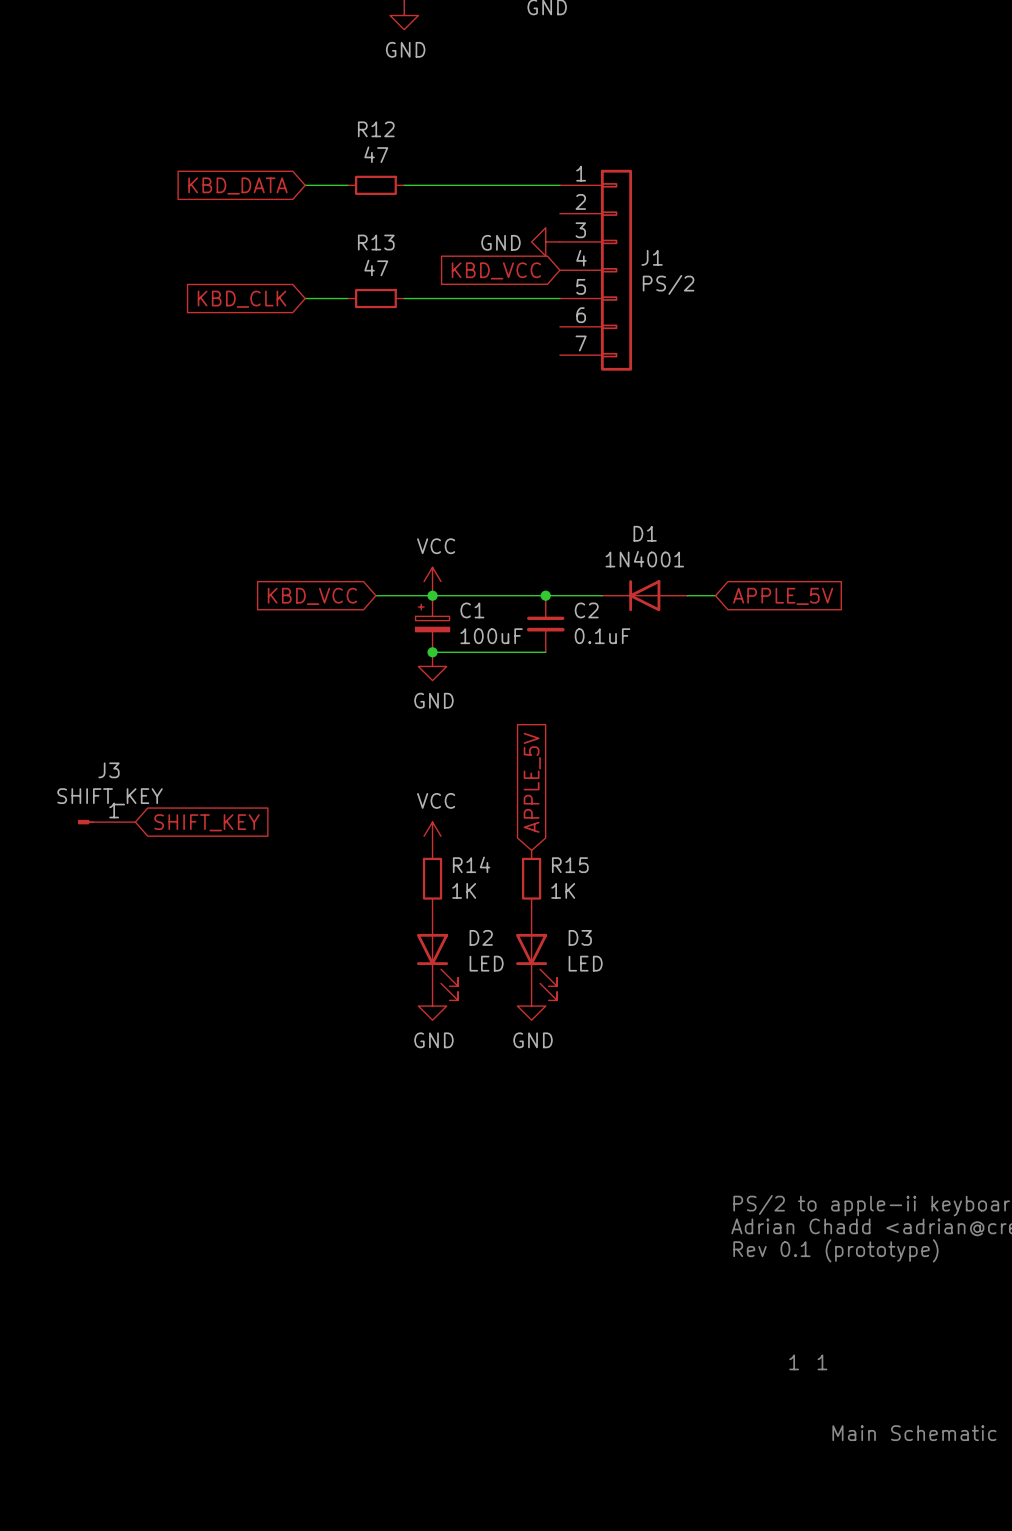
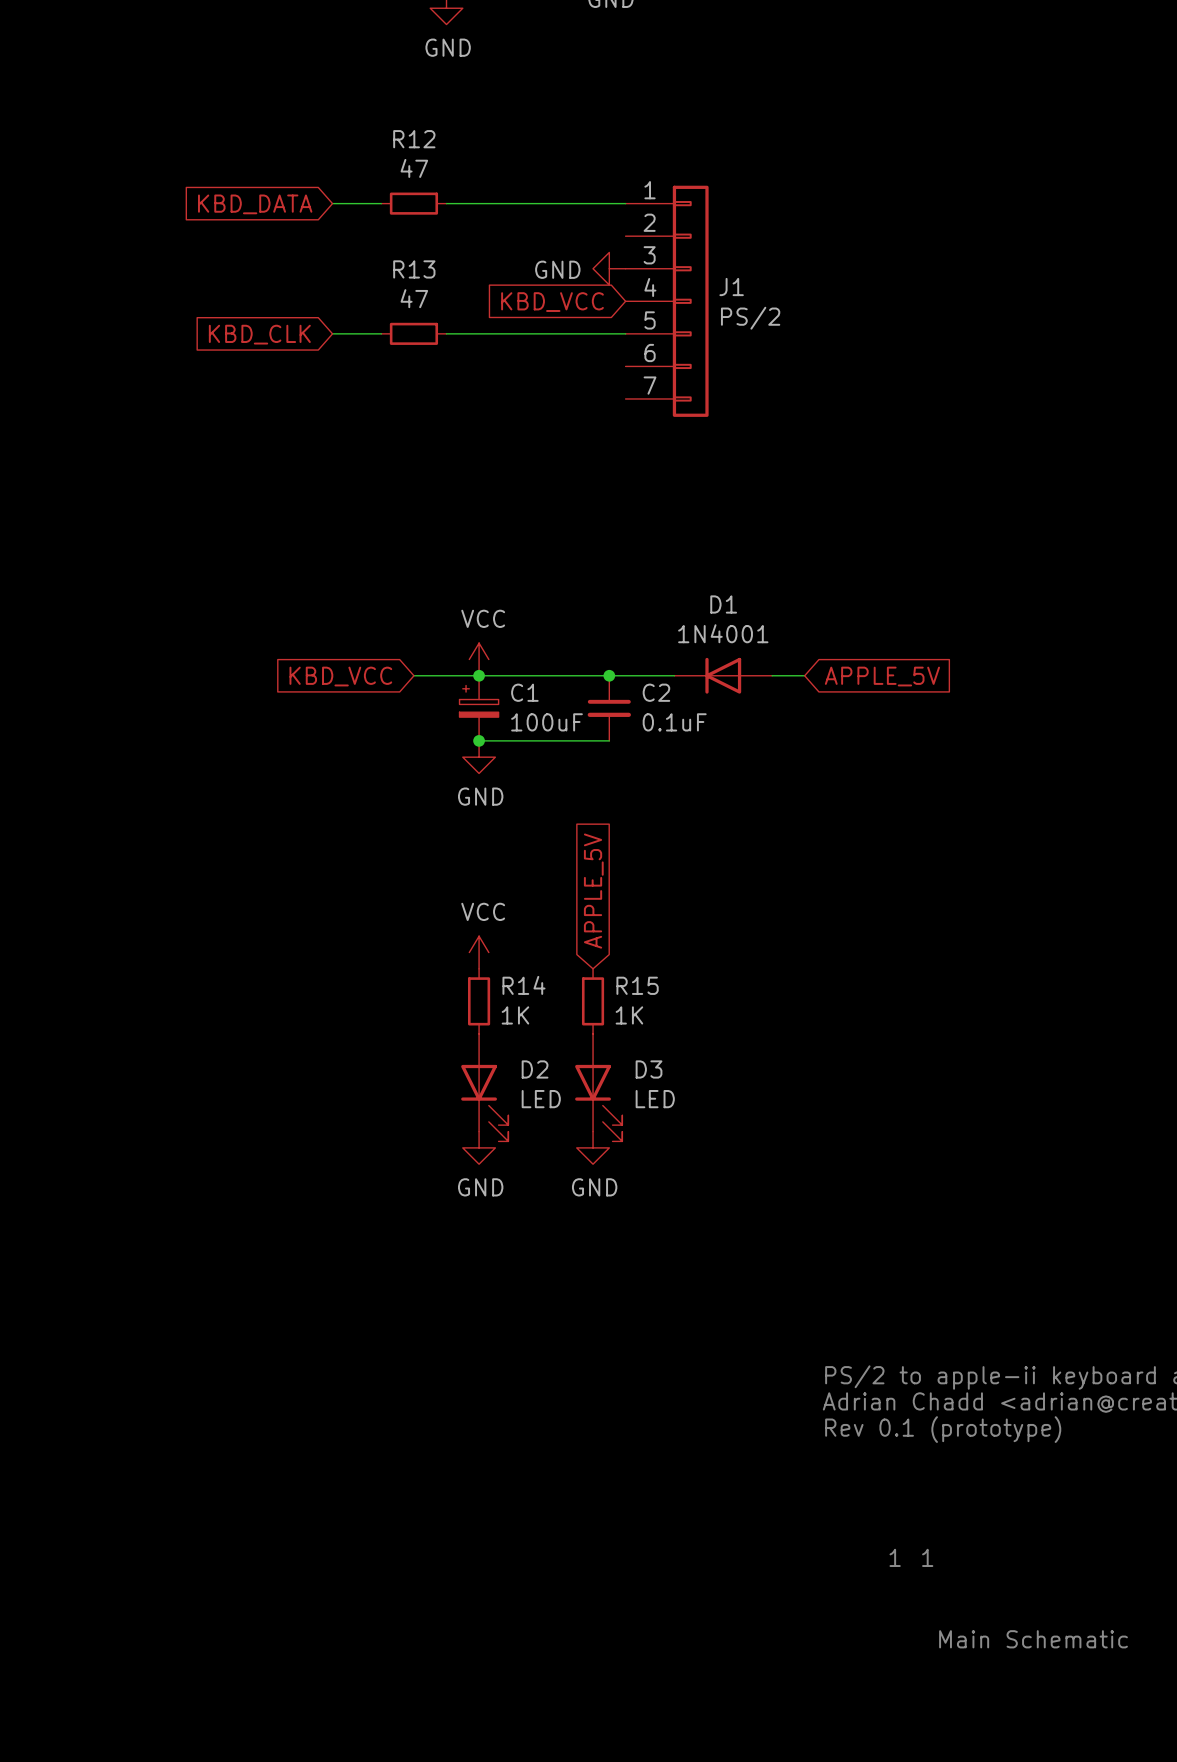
J3: SHIFT_KEY (106, 822) -> none
global label: SHIFT_KEY (207, 822) -> none

